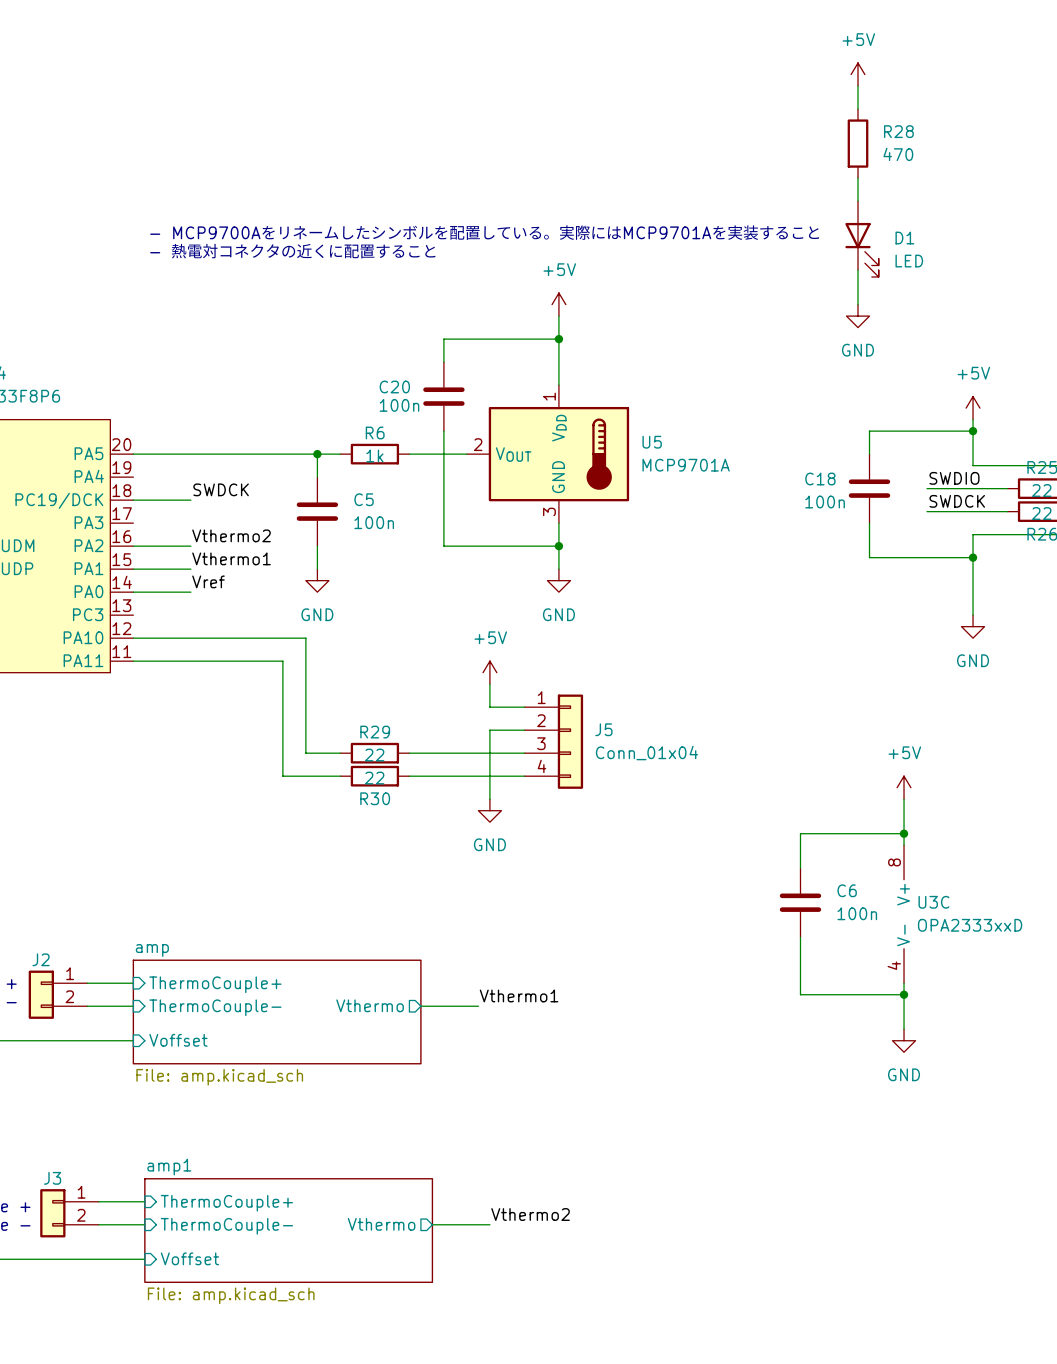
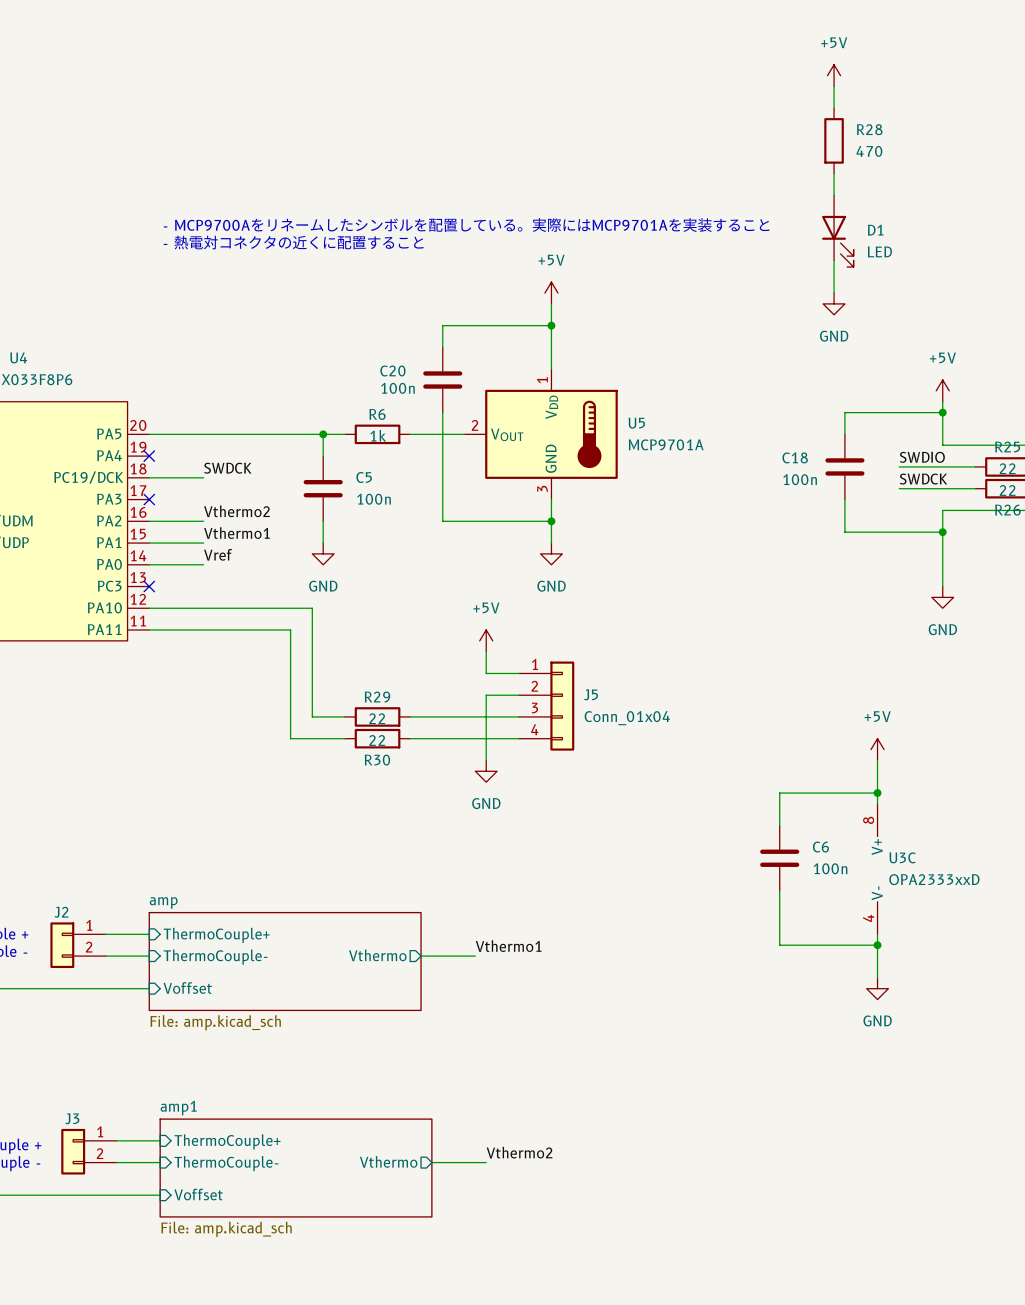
no-connect mark: none -> (149, 456)
no-connect mark: none -> (149, 499)
no-connect mark: none -> (149, 586)

